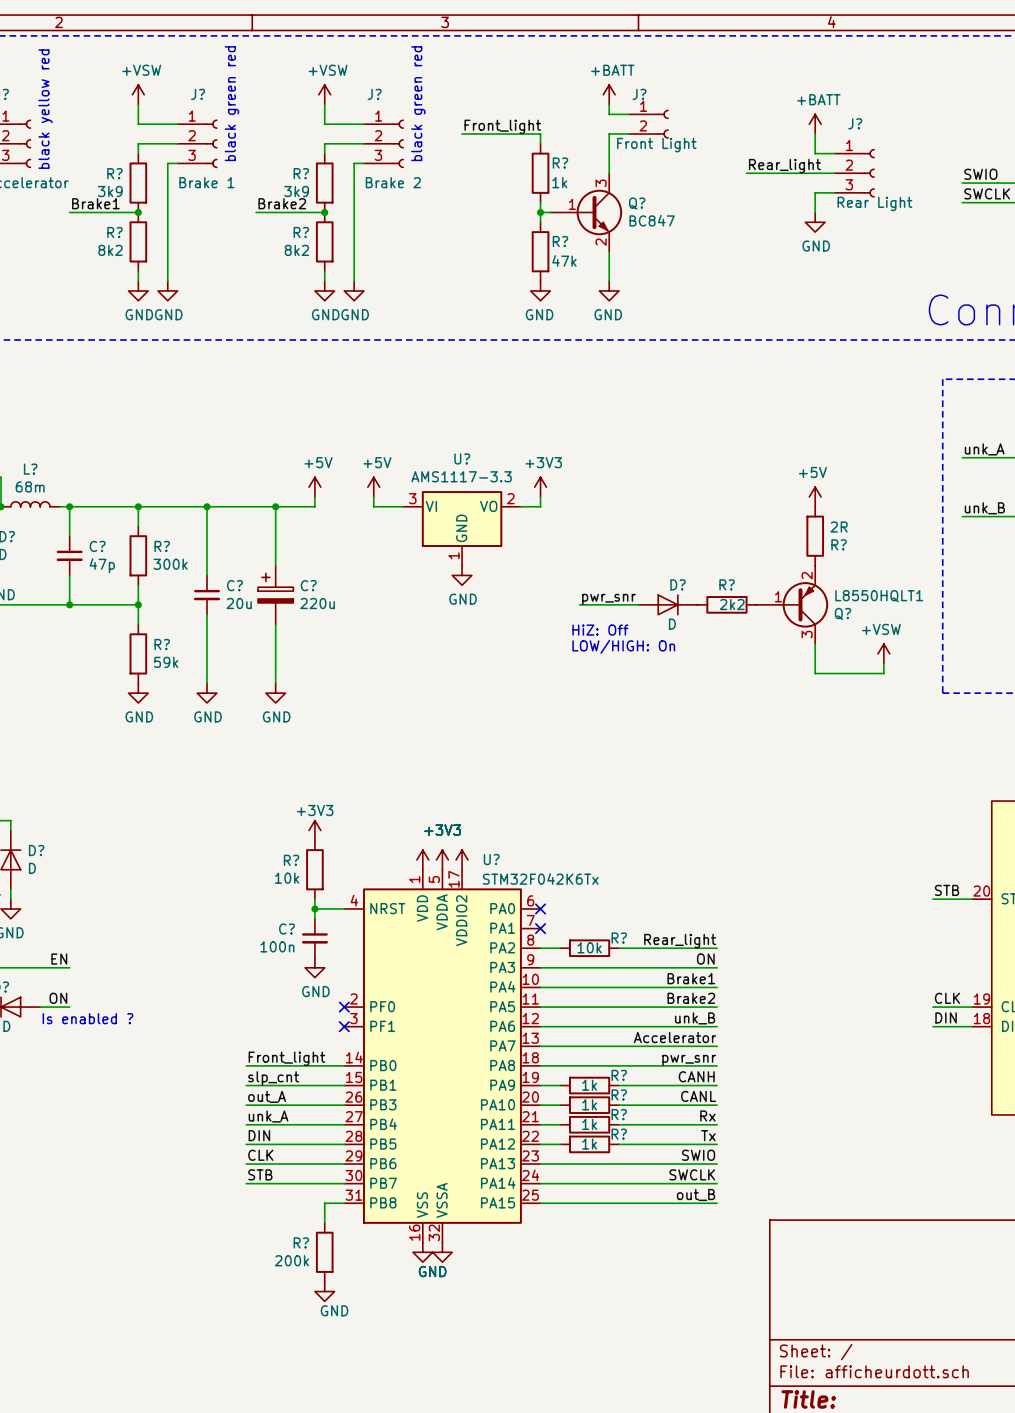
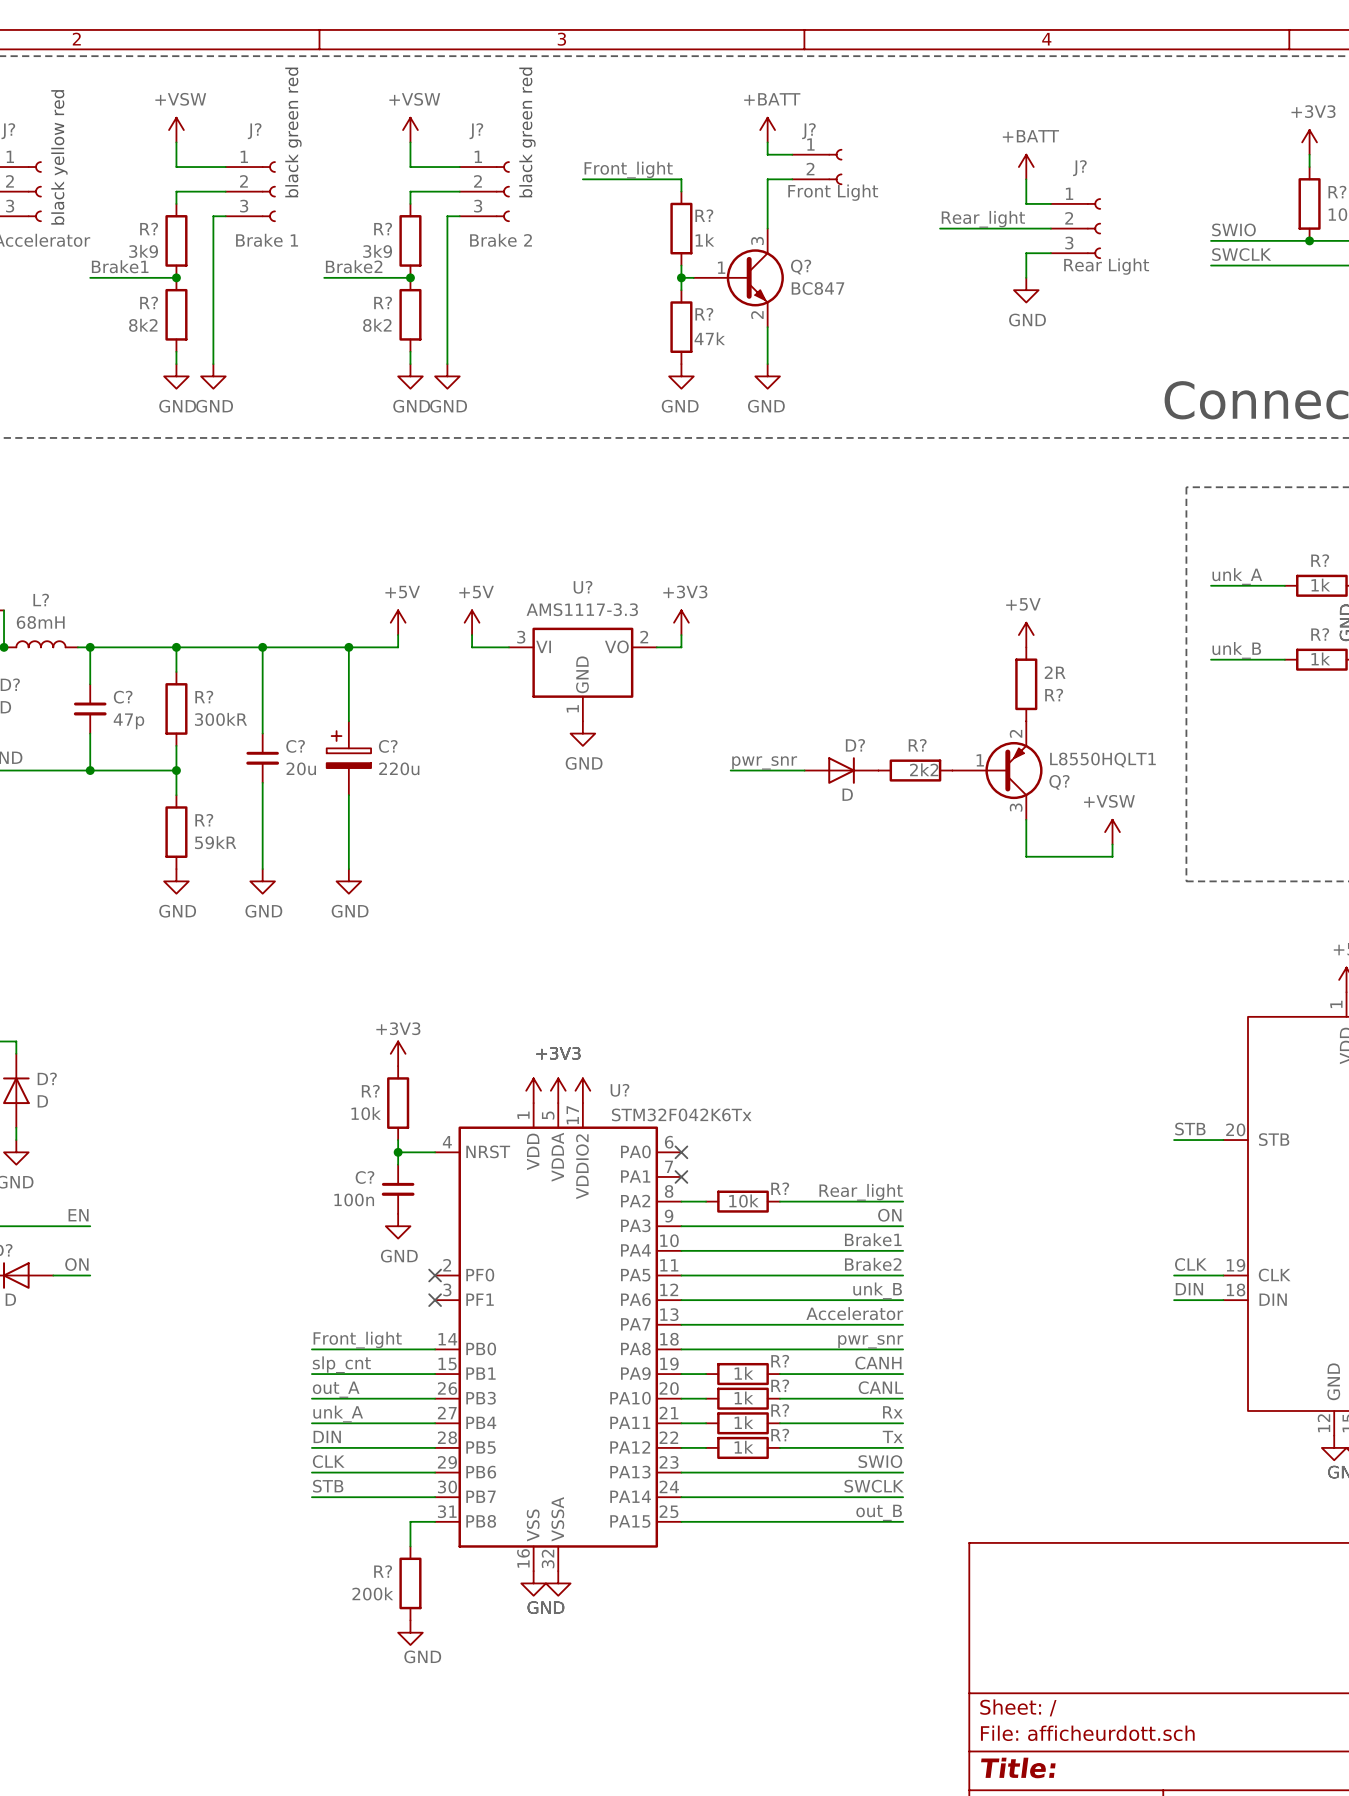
L? value: 68m (30, 486) -> 68mH (40, 622)
R? value: 300k (170, 564) -> 300kR (220, 719)
text: HiZ: Off (600, 630) -> none
text: LOW/HIGH: On (623, 646) -> none
R? value: 59k (166, 662) -> 59kR (215, 842)
text: Is enabled ? (87, 1018) -> none

